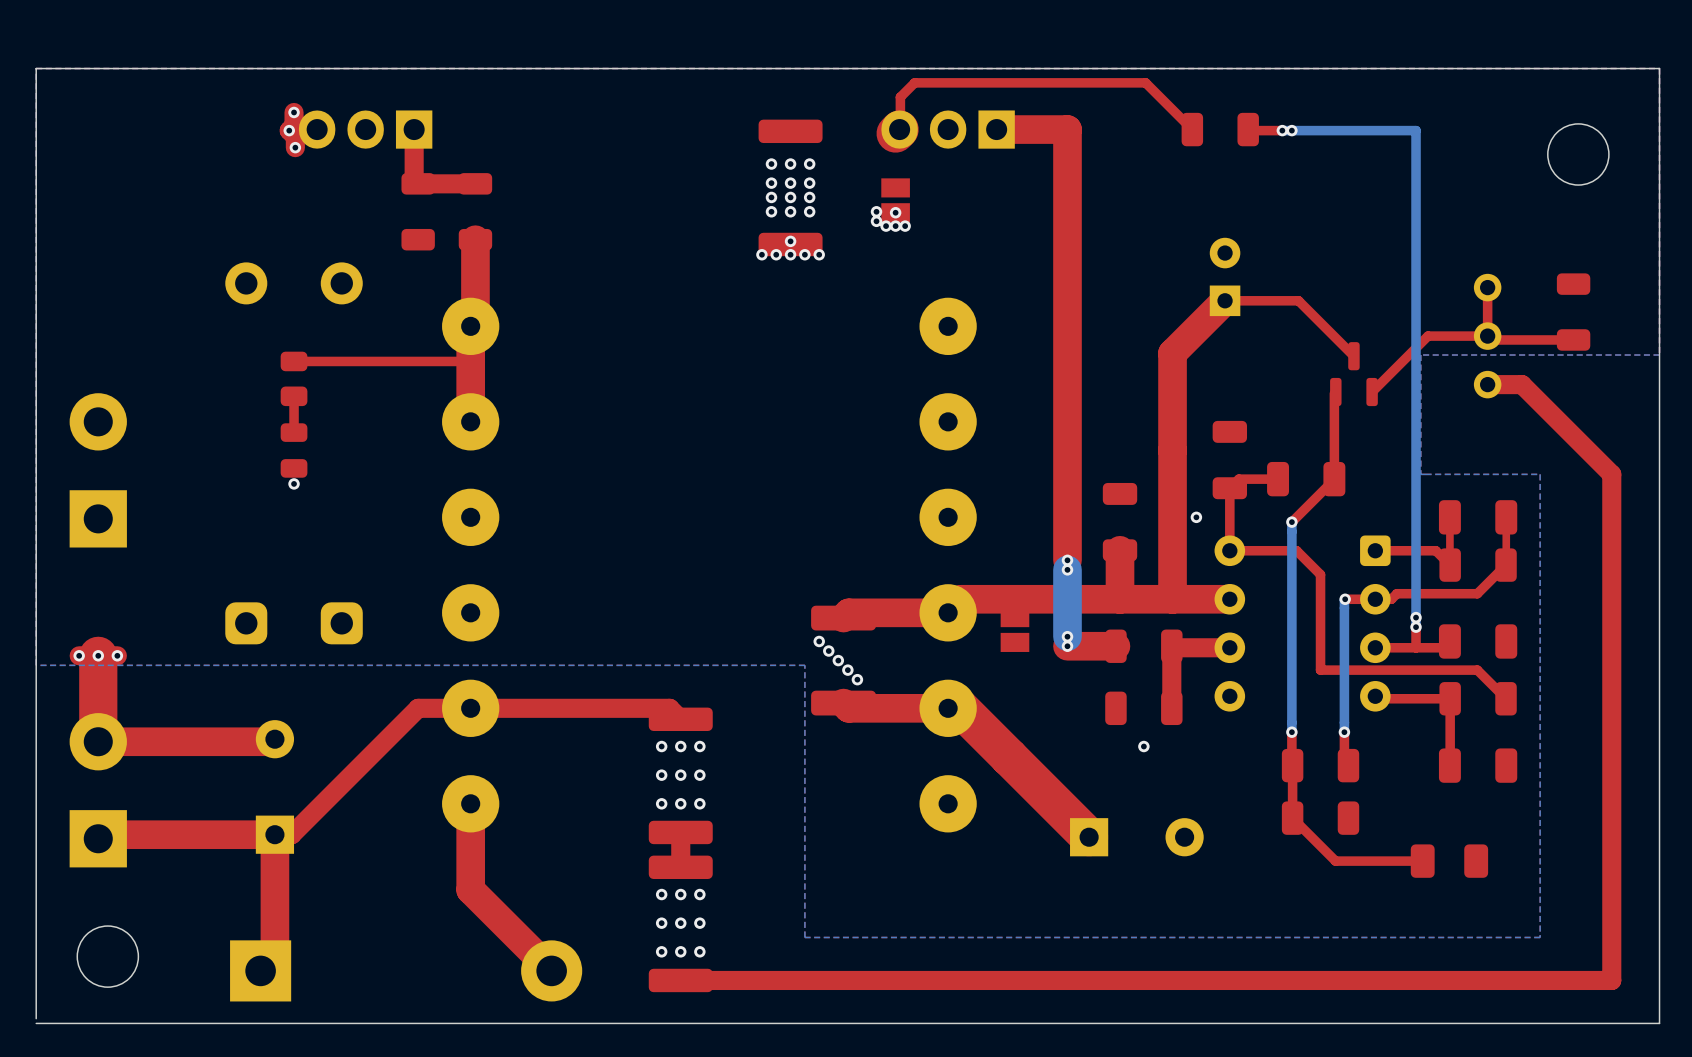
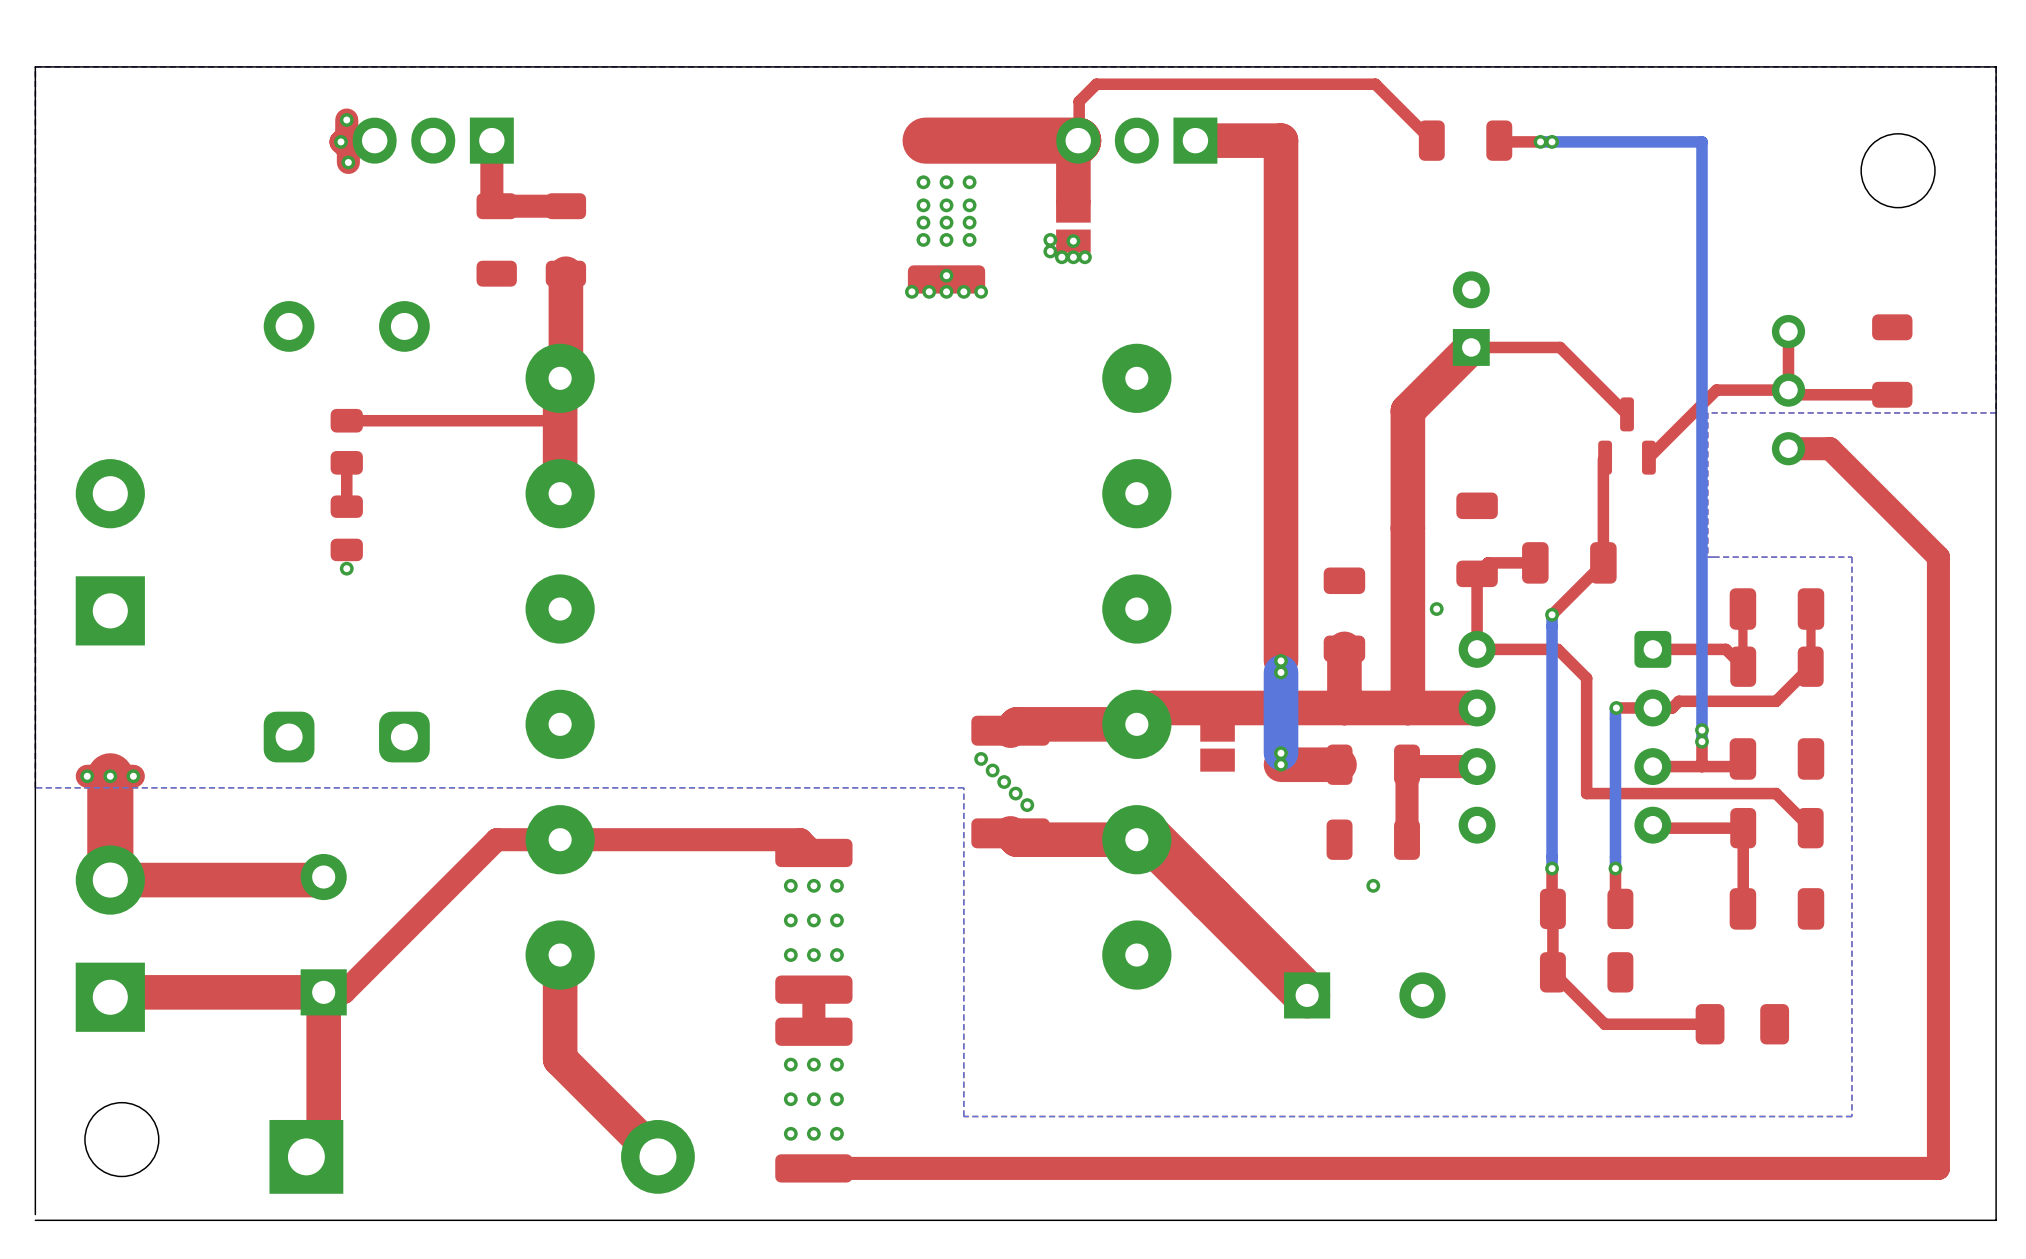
top track: none -> (1078, 140) (925, 140)
top track: none -> (1073, 145) (1073, 201)

